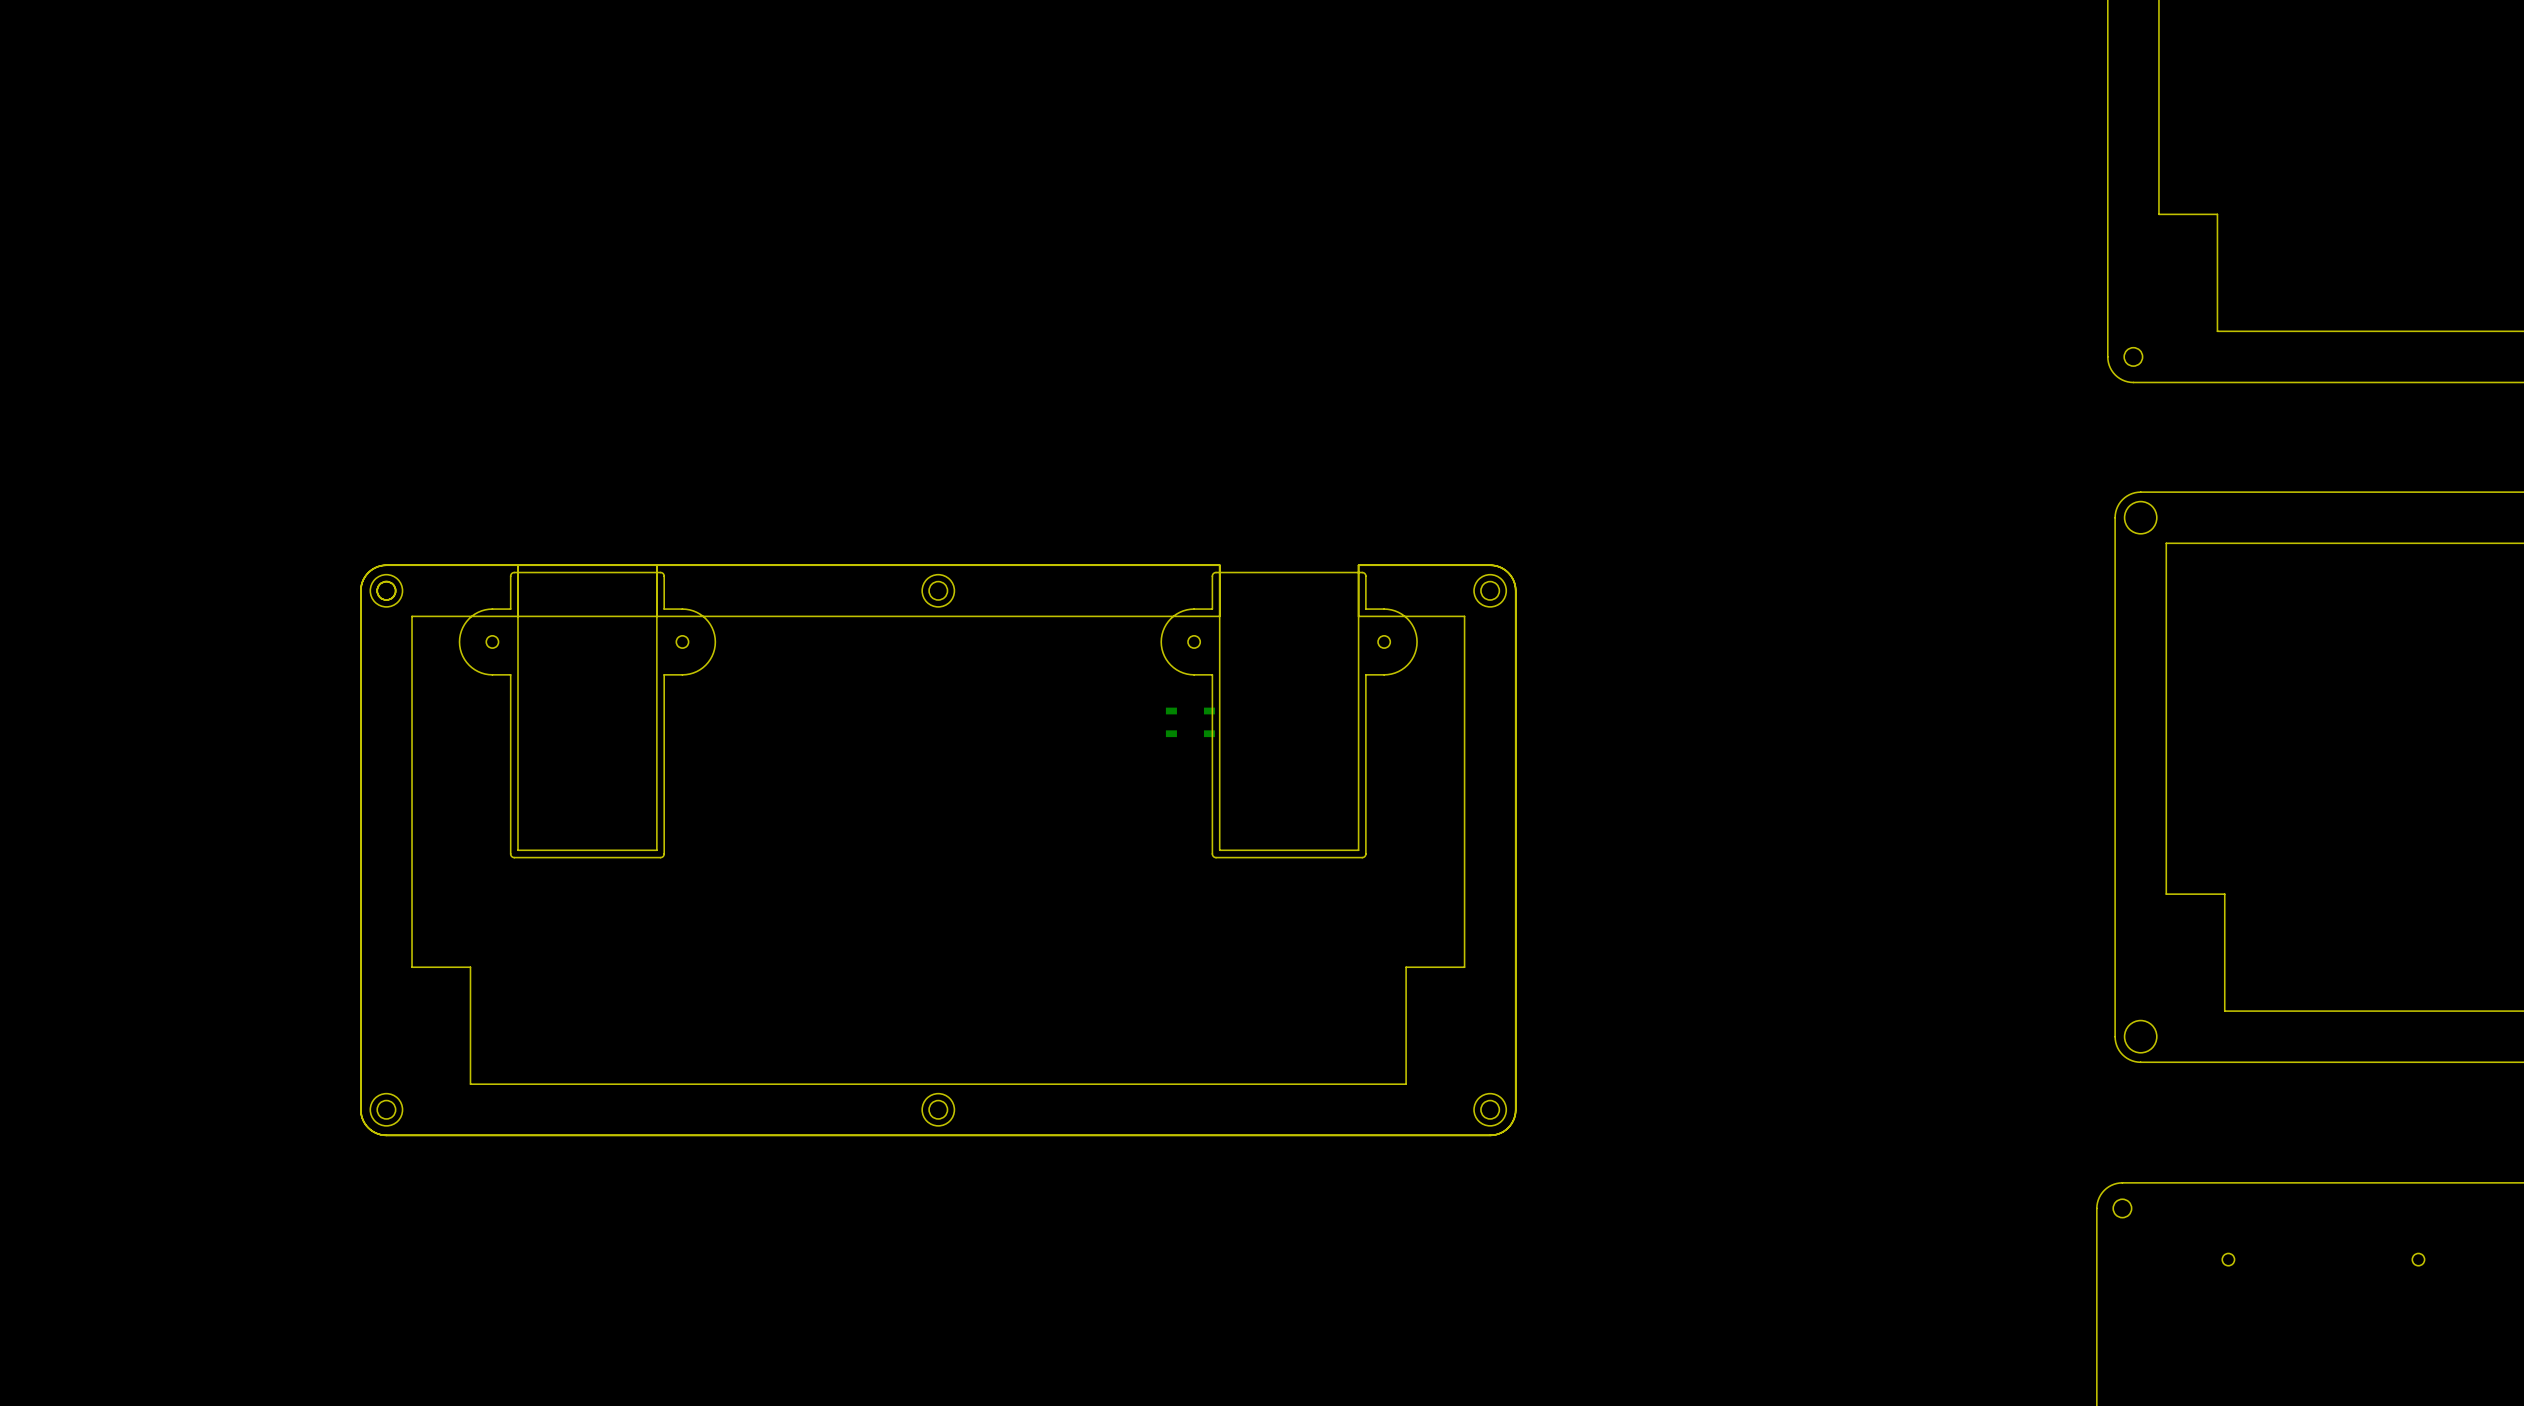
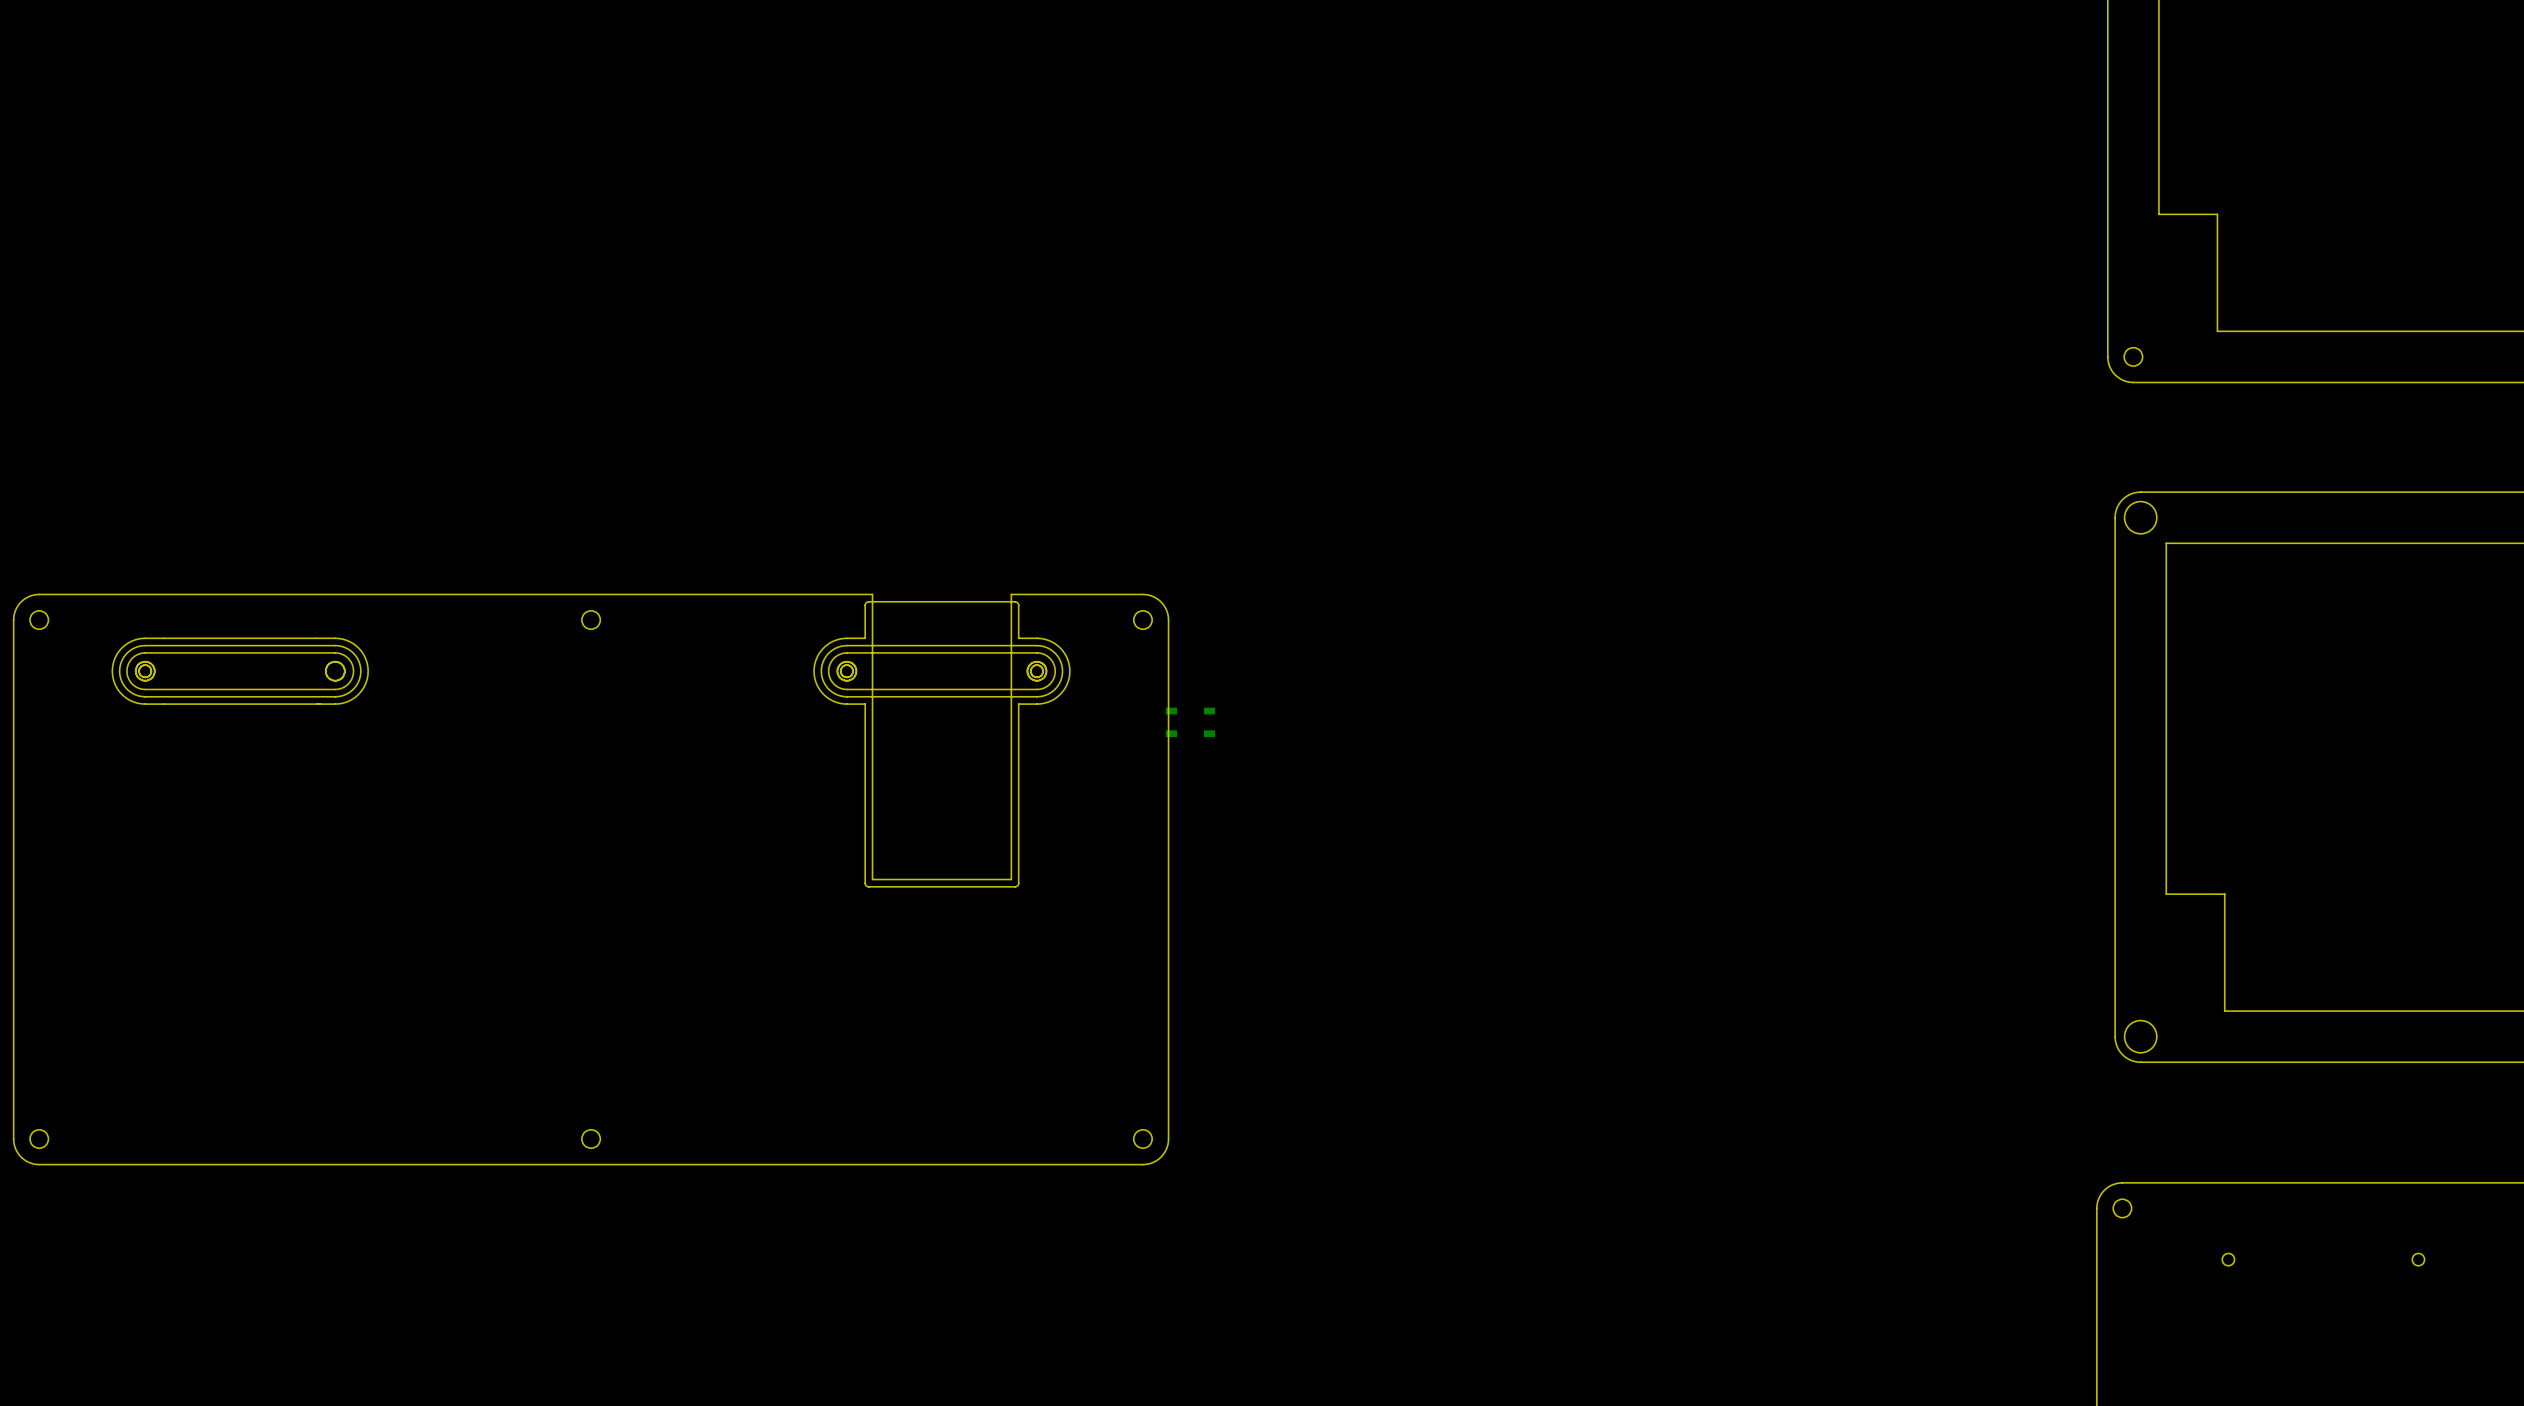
board edge: (386, 565) (1219, 565) (1219, 850) (1358, 850) (1358, 565) (1490, 565) -> none
board edge: (386, 565) (377, 566) (368, 572) (362, 582) (360, 590) -> none
board edge: (386, 565) (377, 566) (368, 572) (362, 582) (360, 590) -> none
board edge: (517, 565) (517, 850) (656, 850) (656, 565) -> none
board edge: (1490, 565) (1501, 567) (1508, 572) (1514, 582) (1515, 590) -> none
board edge: (1490, 565) (1501, 567) (1508, 572) (1514, 582) (1515, 590) -> none
board edge: (514, 572) (661, 572) (664, 575) (664, 609) (693, 610) (702, 616) (712, 627) (715, 645) (712, 656) (705, 665) (689, 674) (664, 674) (664, 853) (662, 857) (514, 857) (511, 855) (510, 674) (488, 674) (474, 669) (462, 656) (459, 641) (462, 627) (474, 614) (488, 609) (510, 609) (510, 575) (514, 572) -> none
board edge: (1216, 572) (1363, 572) (1365, 575) (1365, 609) (1395, 610) (1407, 618) (1413, 627) (1416, 638) (1416, 649) (1407, 665) (1391, 674) (1365, 674) (1365, 853) (1364, 857) (1216, 857) (1212, 855) (1212, 674) (1190, 674) (1176, 669) (1166, 659) (1161, 641) (1166, 624) (1176, 614) (1190, 609) (1212, 609) (1212, 575) (1216, 572) -> none
round board edge: [370, 574, 403, 608] -> none
round board edge: [921, 574, 955, 608] -> none
round board edge: [1473, 574, 1507, 608] -> none
round board edge: [376, 581, 396, 601] -> none
round board edge: [928, 581, 948, 601] -> none
round board edge: [1480, 581, 1500, 601] -> none
board edge: (360, 590) (360, 1109) -> none
board edge: (1515, 590) (1515, 1109) -> none
board edge: none -> (39, 594) (872, 594) (872, 879) (1011, 879) (1011, 594) (1142, 594) (1154, 596) (1164, 606) (1168, 620) (1168, 1139) (1166, 1150) (1156, 1160) (1142, 1164) (39, 1164) (28, 1162) (17, 1152) (13, 1139) (13, 620) (16, 608) (21, 601) (30, 595) (39, 594)
board edge: none -> (868, 601) (1015, 601) (1018, 604) (1018, 638) (1047, 640) (1060, 647) (1066, 656) (1069, 674) (1066, 685) (1060, 694) (1044, 703) (1018, 704) (1018, 883) (1016, 886) (868, 886) (865, 885) (865, 704) (843, 703) (829, 699) (817, 685) (814, 671) (817, 656) (829, 643) (843, 638) (865, 638) (865, 604) (868, 601)
round board edge: none -> [29, 610, 49, 630]
round board edge: none -> [581, 610, 601, 630]
round board edge: none -> [1133, 610, 1153, 630]
board edge: (1219, 616) (412, 616) (412, 967) (470, 967) (470, 1084) (1406, 1084) (1406, 967) (1464, 967) (1464, 616) (1358, 616) -> none
round board edge: [485, 635, 499, 649] -> none
round board edge: [676, 635, 689, 649] -> none
round board edge: [1187, 635, 1201, 649] -> none
round board edge: [1377, 635, 1391, 649] -> none
board edge: none -> (145, 638) (342, 639) (352, 643) (363, 653) (367, 667) (367, 678) (358, 694) (349, 700) (338, 703) (137, 703) (127, 699) (119, 691) (113, 678) (112, 667) (115, 656) (121, 647) (134, 640) (145, 638)
board edge: none -> (145, 645) (338, 645) (349, 650) (356, 656) (360, 665) (360, 674) (357, 683) (352, 690) (338, 696) (142, 696) (130, 692) (124, 685) (120, 677) (119, 668) (122, 659) (128, 652) (136, 647) (145, 645)
board edge: none -> (846, 645) (1040, 645) (1051, 650) (1058, 656) (1061, 665) (1062, 674) (1059, 683) (1053, 690) (1040, 696) (843, 696) (832, 692) (825, 685) (822, 677) (821, 668) (824, 659) (829, 652) (837, 647) (846, 645)
board edge: none -> (145, 652) (337, 653) (349, 660) (353, 673) (348, 684) (337, 689) (142, 689) (130, 682) (127, 668) (132, 658) (145, 652)
board edge: none -> (846, 652) (1039, 653) (1051, 660) (1055, 673) (1049, 684) (1039, 689) (844, 689) (834, 684) (828, 671) (834, 658) (846, 652)
round board edge: none -> [135, 661, 156, 682]
round board edge: none -> [325, 661, 346, 682]
round board edge: none -> [837, 661, 857, 682]
round board edge: none -> [1027, 661, 1047, 682]
round board edge: none -> [138, 664, 152, 678]
round board edge: none -> [840, 664, 854, 678]
round board edge: none -> [1030, 664, 1044, 678]
round board edge: [370, 1093, 403, 1127] -> none
round board edge: [921, 1093, 955, 1127] -> none
round board edge: [1473, 1093, 1507, 1127] -> none
round board edge: [376, 1100, 396, 1120] -> none
round board edge: [928, 1100, 948, 1120] -> none
round board edge: [1480, 1100, 1500, 1120] -> none
board edge: (360, 1109) (362, 1118) (368, 1127) (375, 1132) (386, 1135) -> none
board edge: (360, 1109) (362, 1118) (368, 1127) (375, 1132) (386, 1135) -> none
board edge: (1515, 1109) (1514, 1118) (1508, 1127) (1501, 1132) (1490, 1135) -> none
board edge: (1515, 1109) (1514, 1118) (1508, 1127) (1501, 1132) (1490, 1135) -> none
round board edge: none -> [29, 1129, 49, 1149]
round board edge: none -> [581, 1129, 601, 1149]
round board edge: none -> [1133, 1129, 1153, 1149]
board edge: (386, 1135) (1490, 1135) -> none

